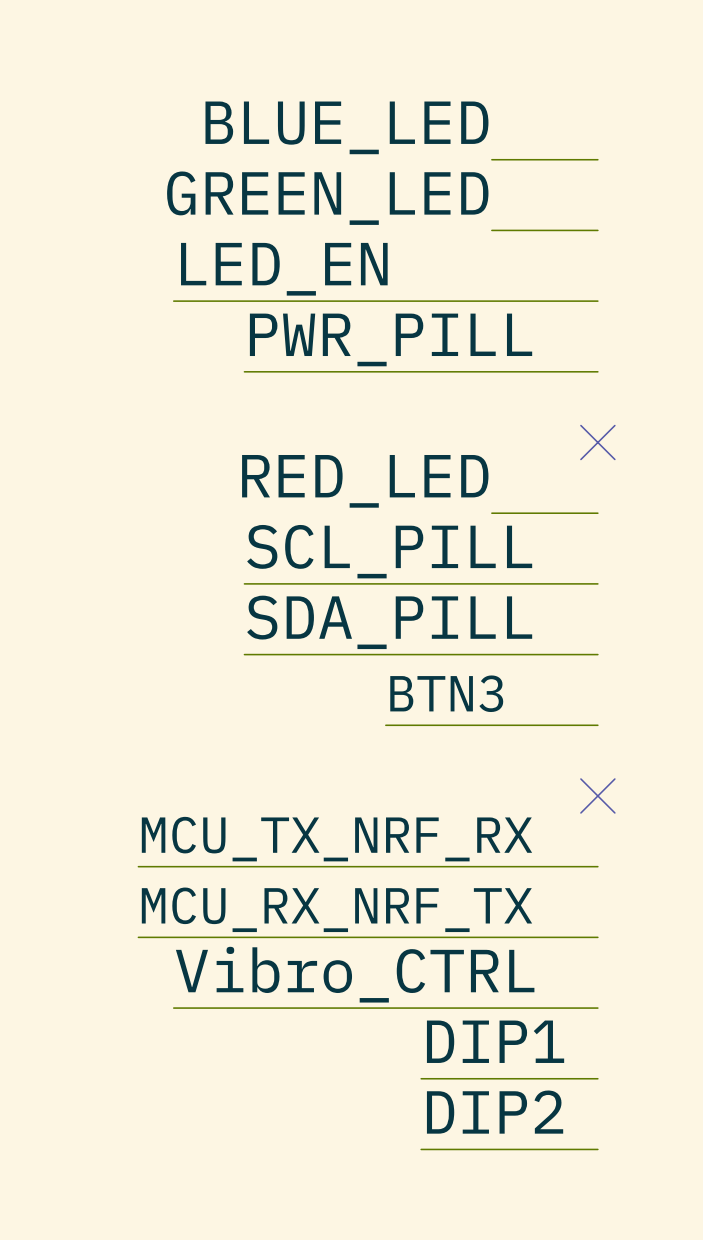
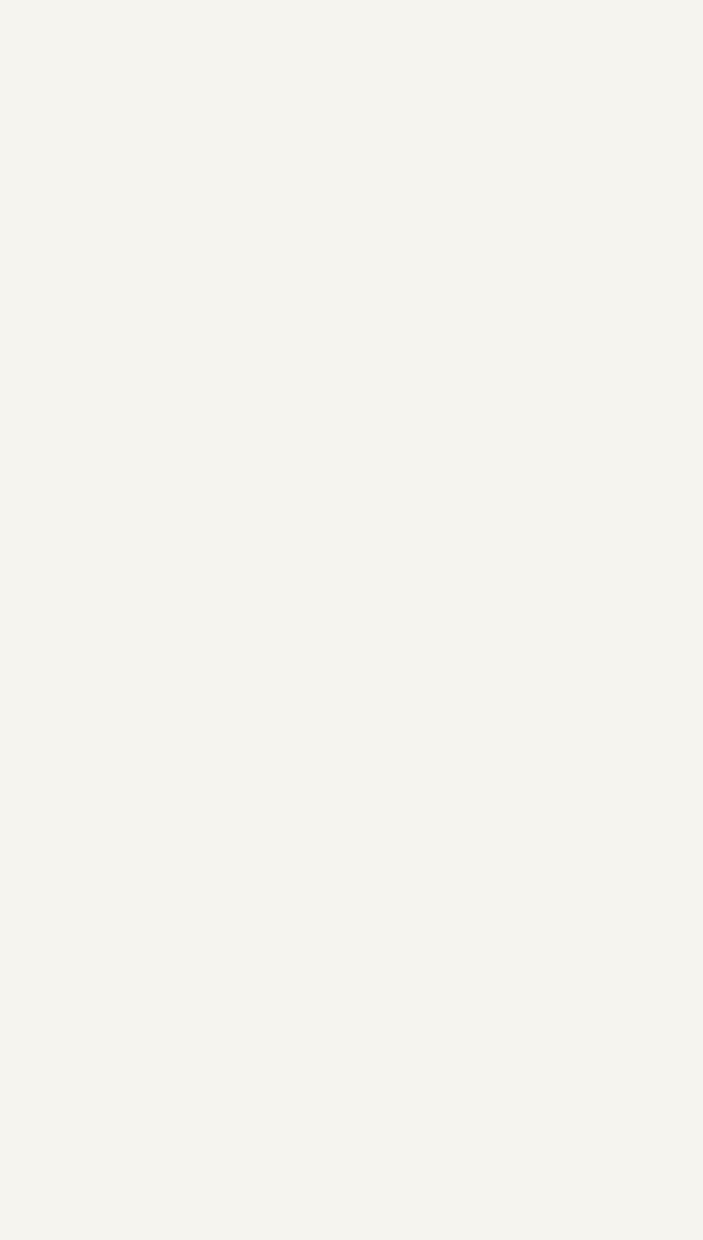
label: BLUE_LED (346, 127) -> none
wire: (491, 159) (597, 159) -> none
label: GREEN_LED (327, 198) -> none
wire: (491, 230) (597, 230) -> none
label: LED_EN (284, 269) -> none
wire: (173, 301) (597, 301) -> none
label: PWR_PILL (391, 339) -> none
wire: (244, 371) (597, 371) -> none
no-connect mark: (597, 442) -> none
label: RED_LED (365, 481) -> none
wire: (491, 513) (597, 513) -> none
label: SCL_PILL (389, 551) -> none
wire: (244, 583) (597, 583) -> none
label: SDA_PILL (389, 622) -> none
wire: (244, 654) (597, 654) -> none
label: BTN3 (446, 693) -> none
wire: (385, 725) (597, 725) -> none
no-connect mark: (597, 795) -> none
label: MCU_TX_NRF_RX (336, 839) -> none
wire: (138, 866) (597, 866) -> none
label: MCU_RX_NRF_TX (336, 909) -> none
wire: (138, 937) (597, 937) -> none
label: Vibro_CTRL (355, 974) -> none
wire: (173, 1008) (597, 1008) -> none
label: DIP1 (495, 1041) -> none
wire: (421, 1078) (597, 1078) -> none
label: DIP2 (495, 1112) -> none
wire: (421, 1149) (597, 1149) -> none

